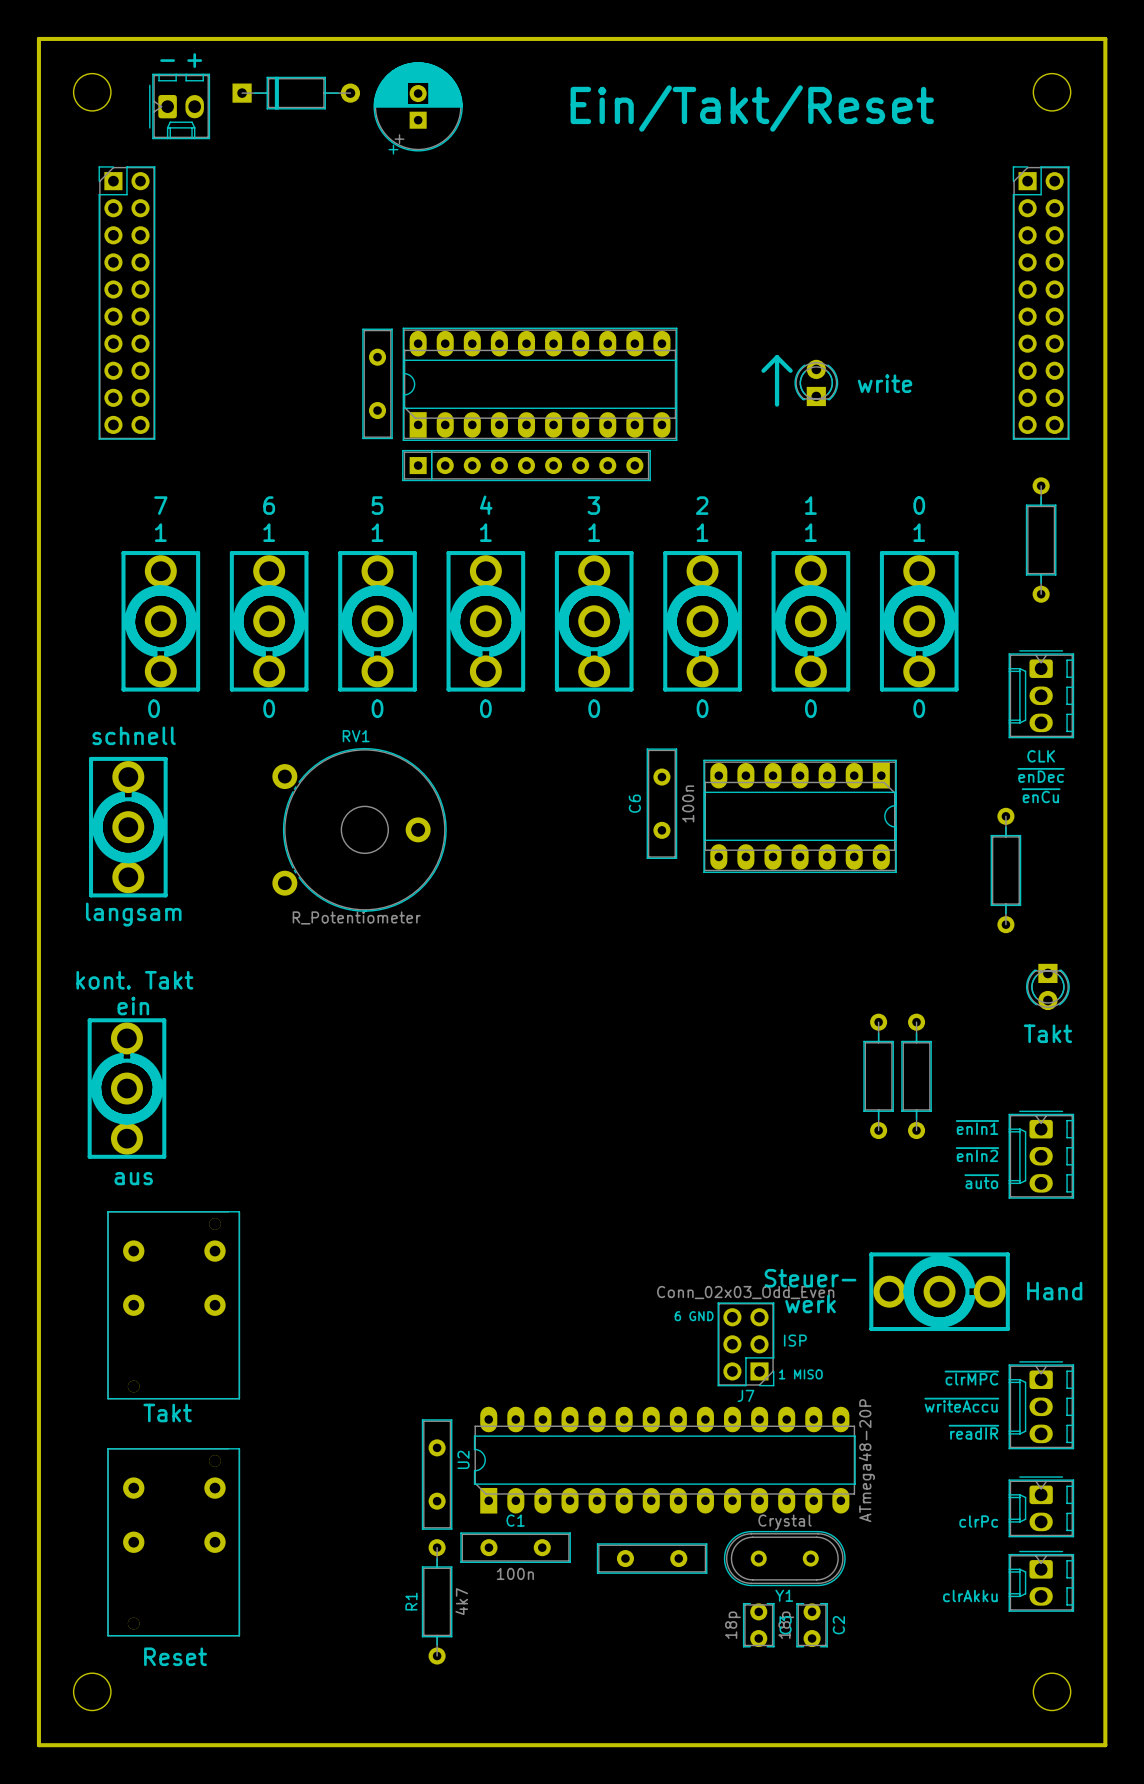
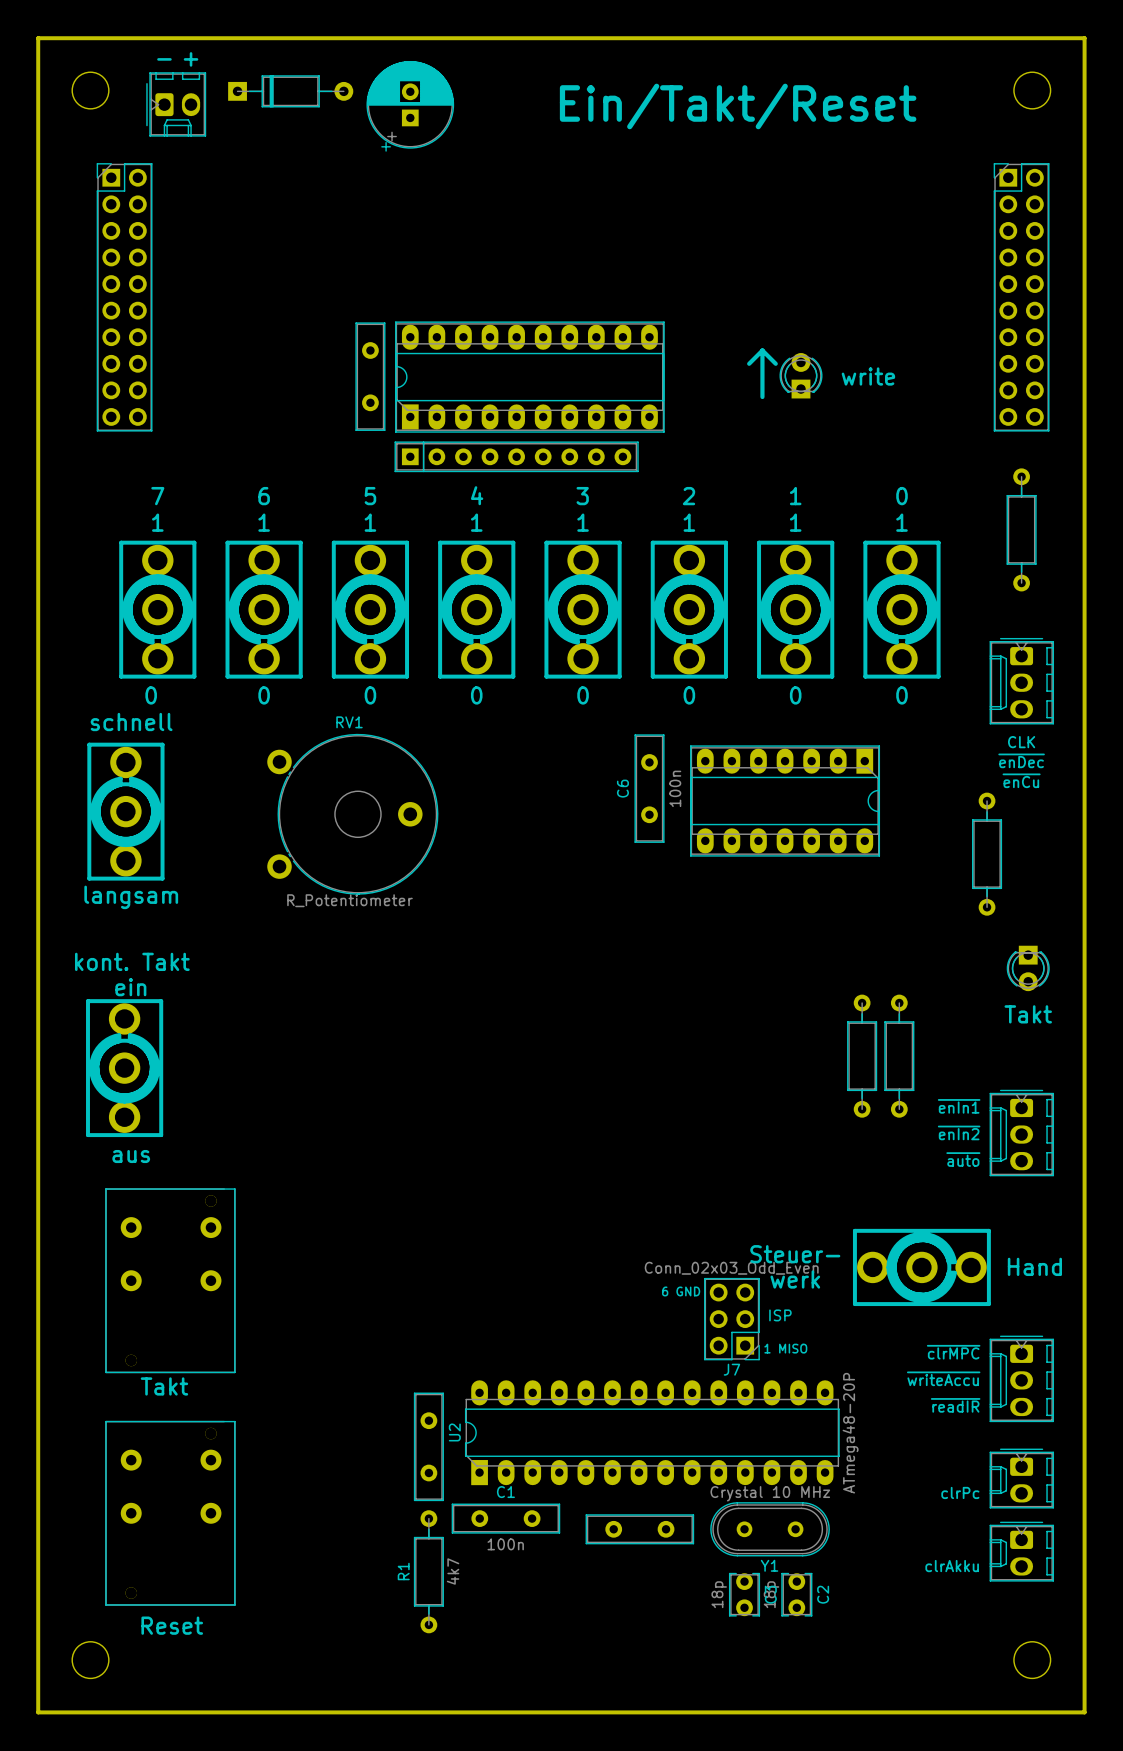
Y1 value: Crystal (785, 1522) -> Crystal 10 MHz (770, 1493)

